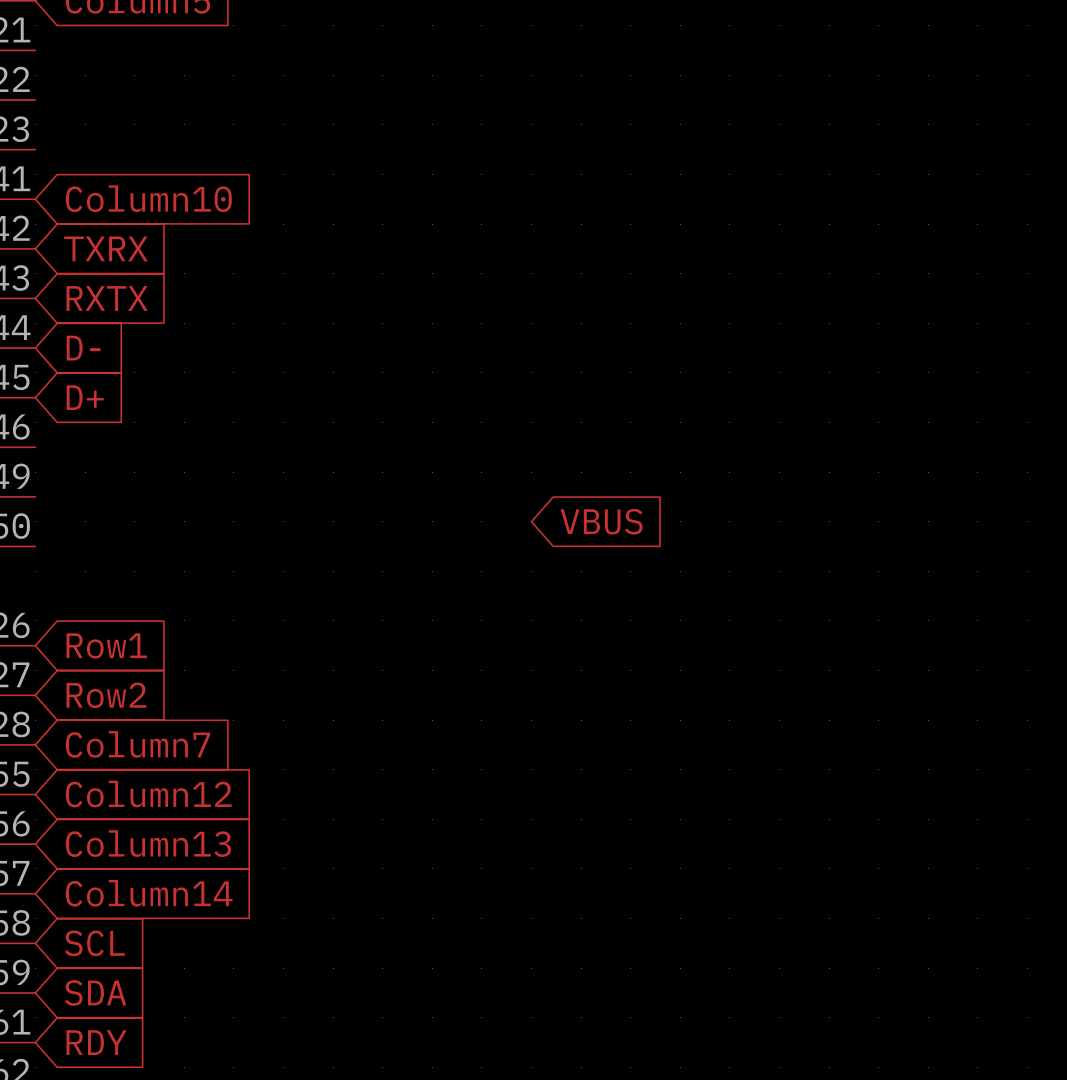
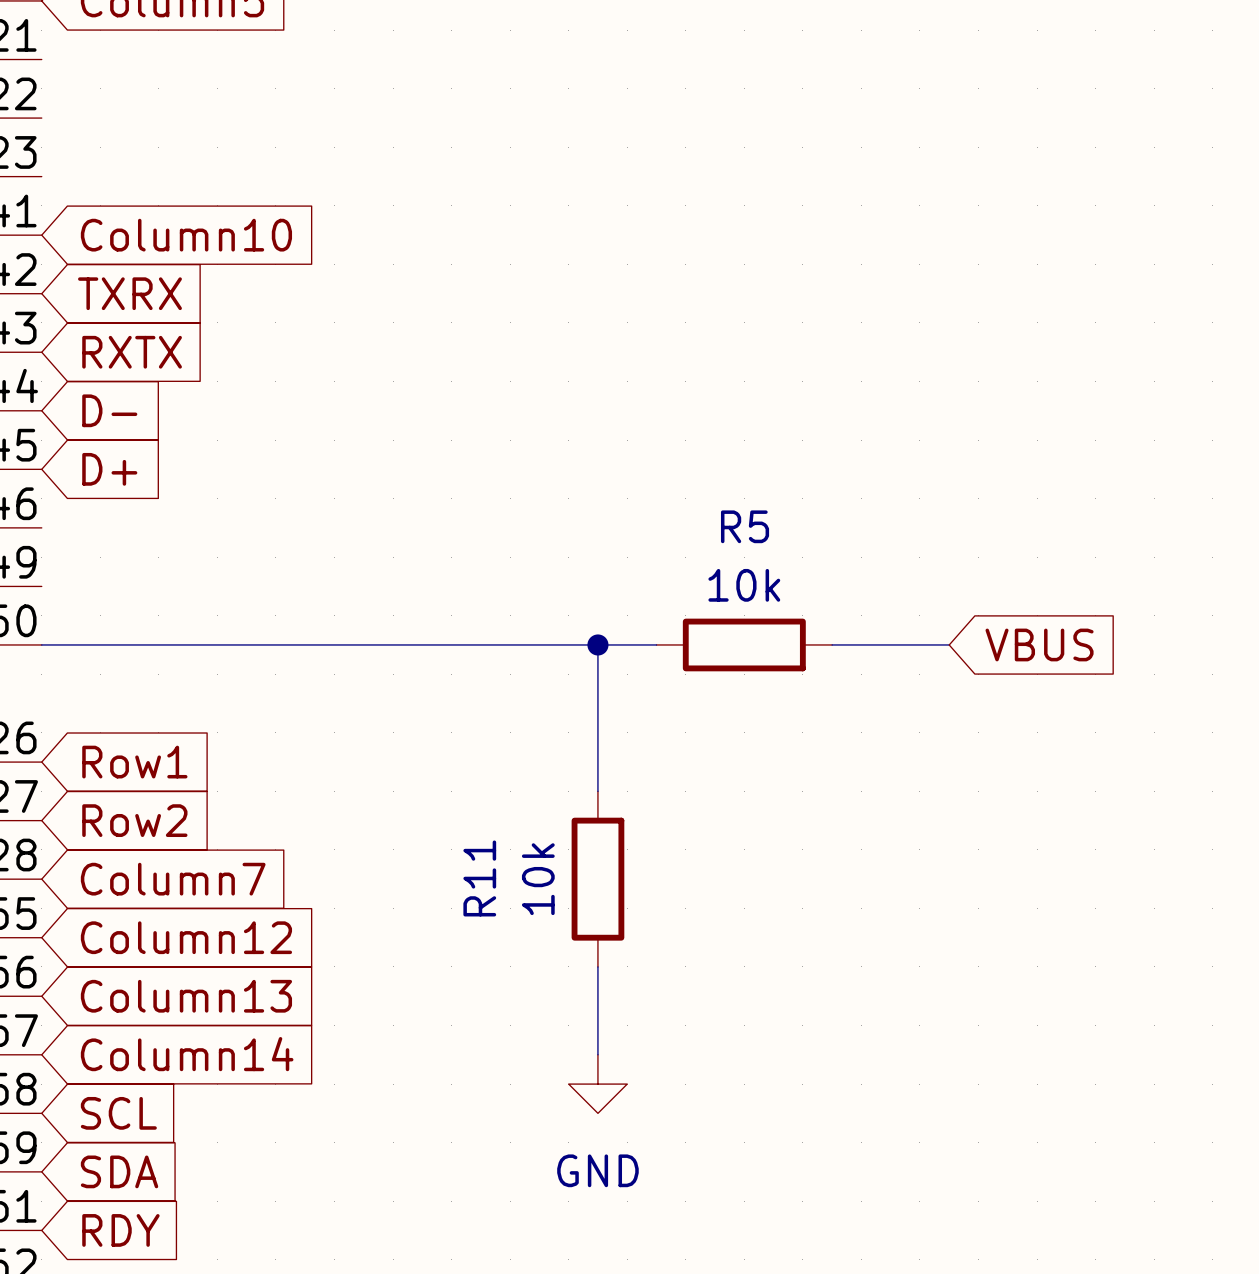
global label position: VBUS (601, 521) -> VBUS (1039, 644)
wire: none -> (41, 644) (656, 644)
wire: none -> (597, 644) (597, 791)
junction: none -> (597, 644)
R5: none -> 10k (744, 644)
wire: none -> (832, 644) (949, 644)
R11: none -> 10k (597, 879)
wire: none -> (597, 966) (597, 1054)
power symbol: none -> GND (597, 1084)

